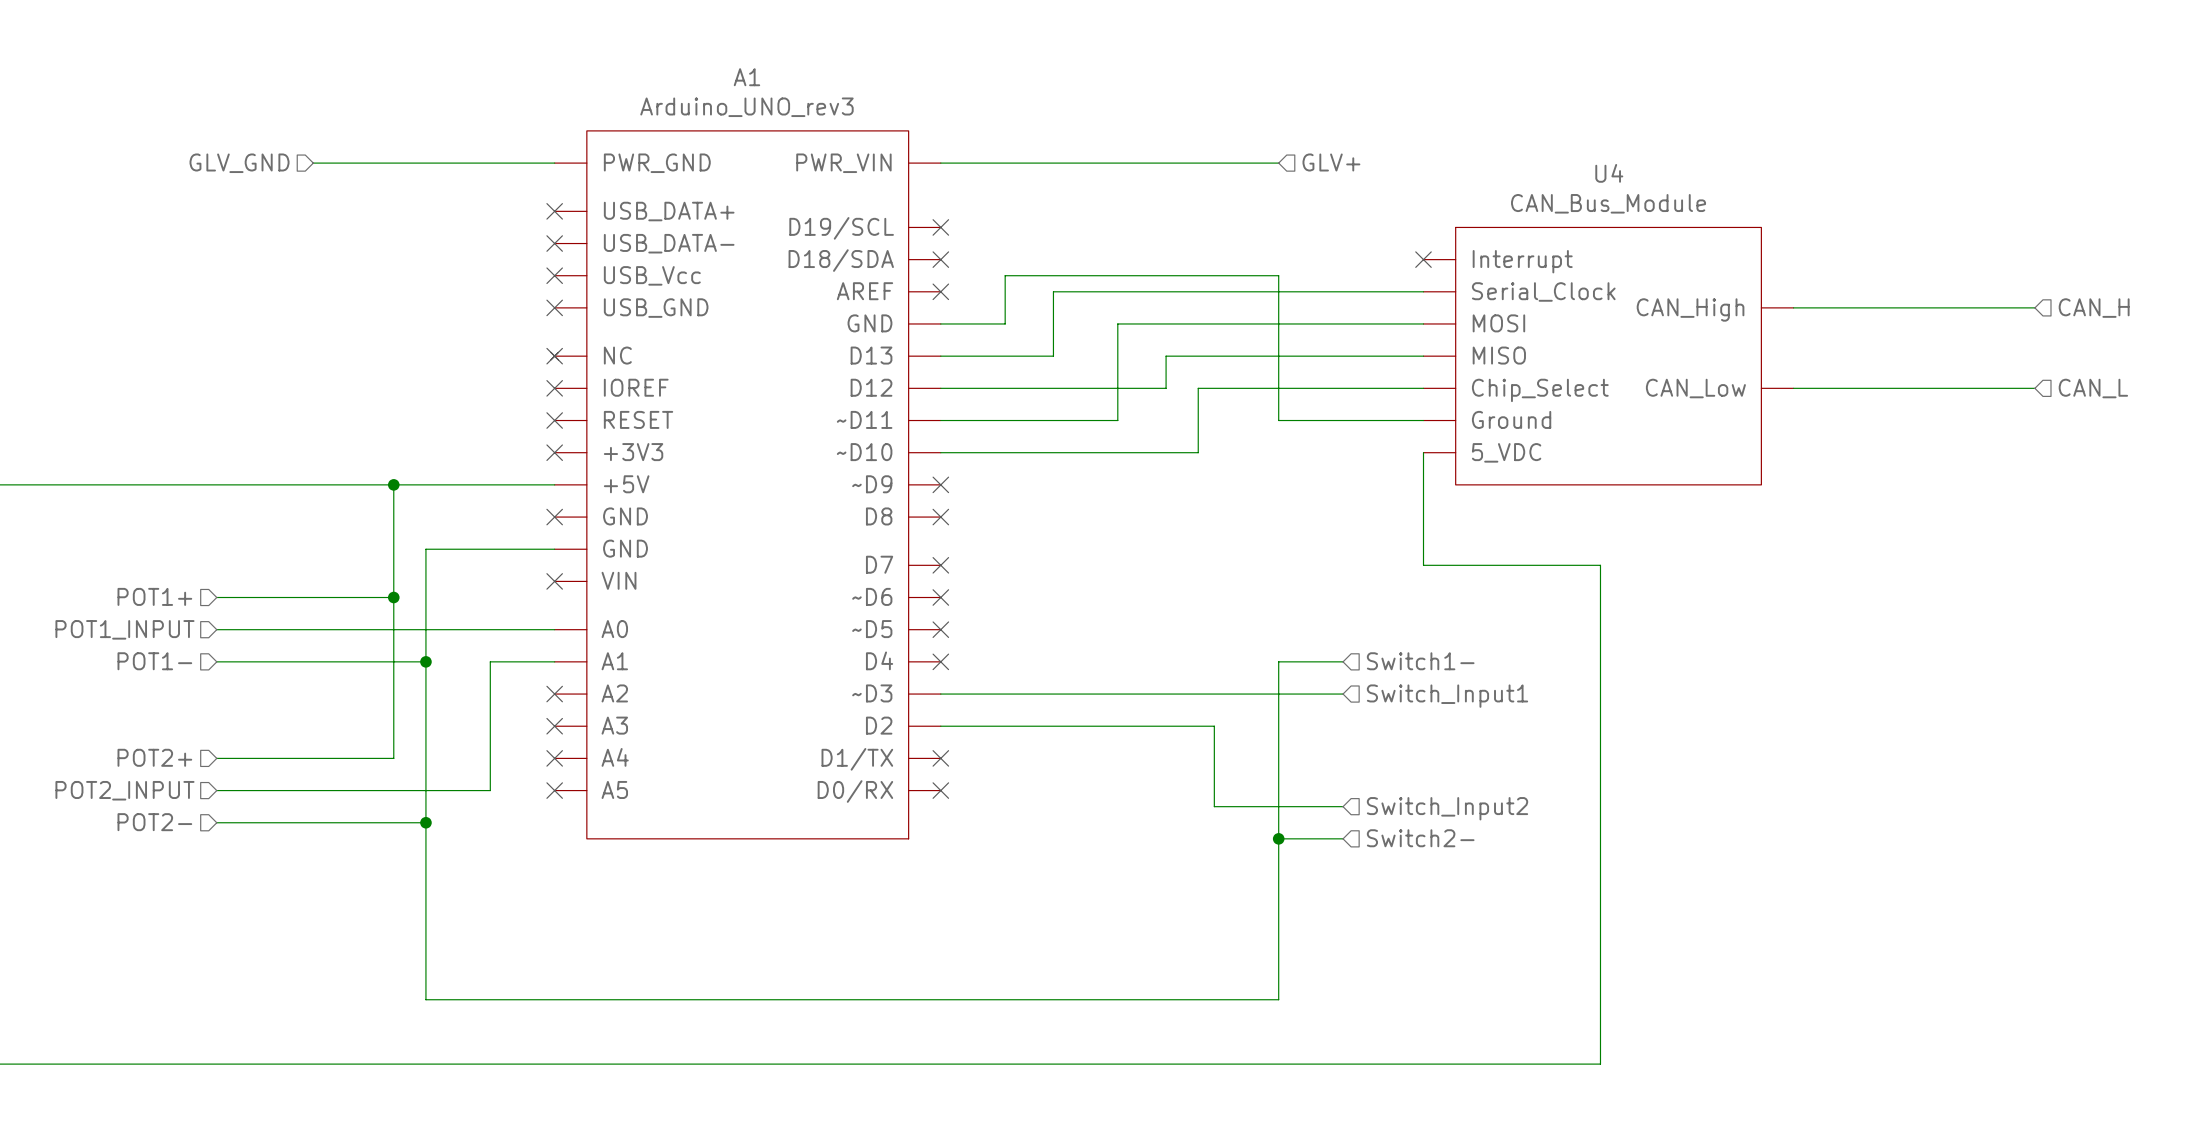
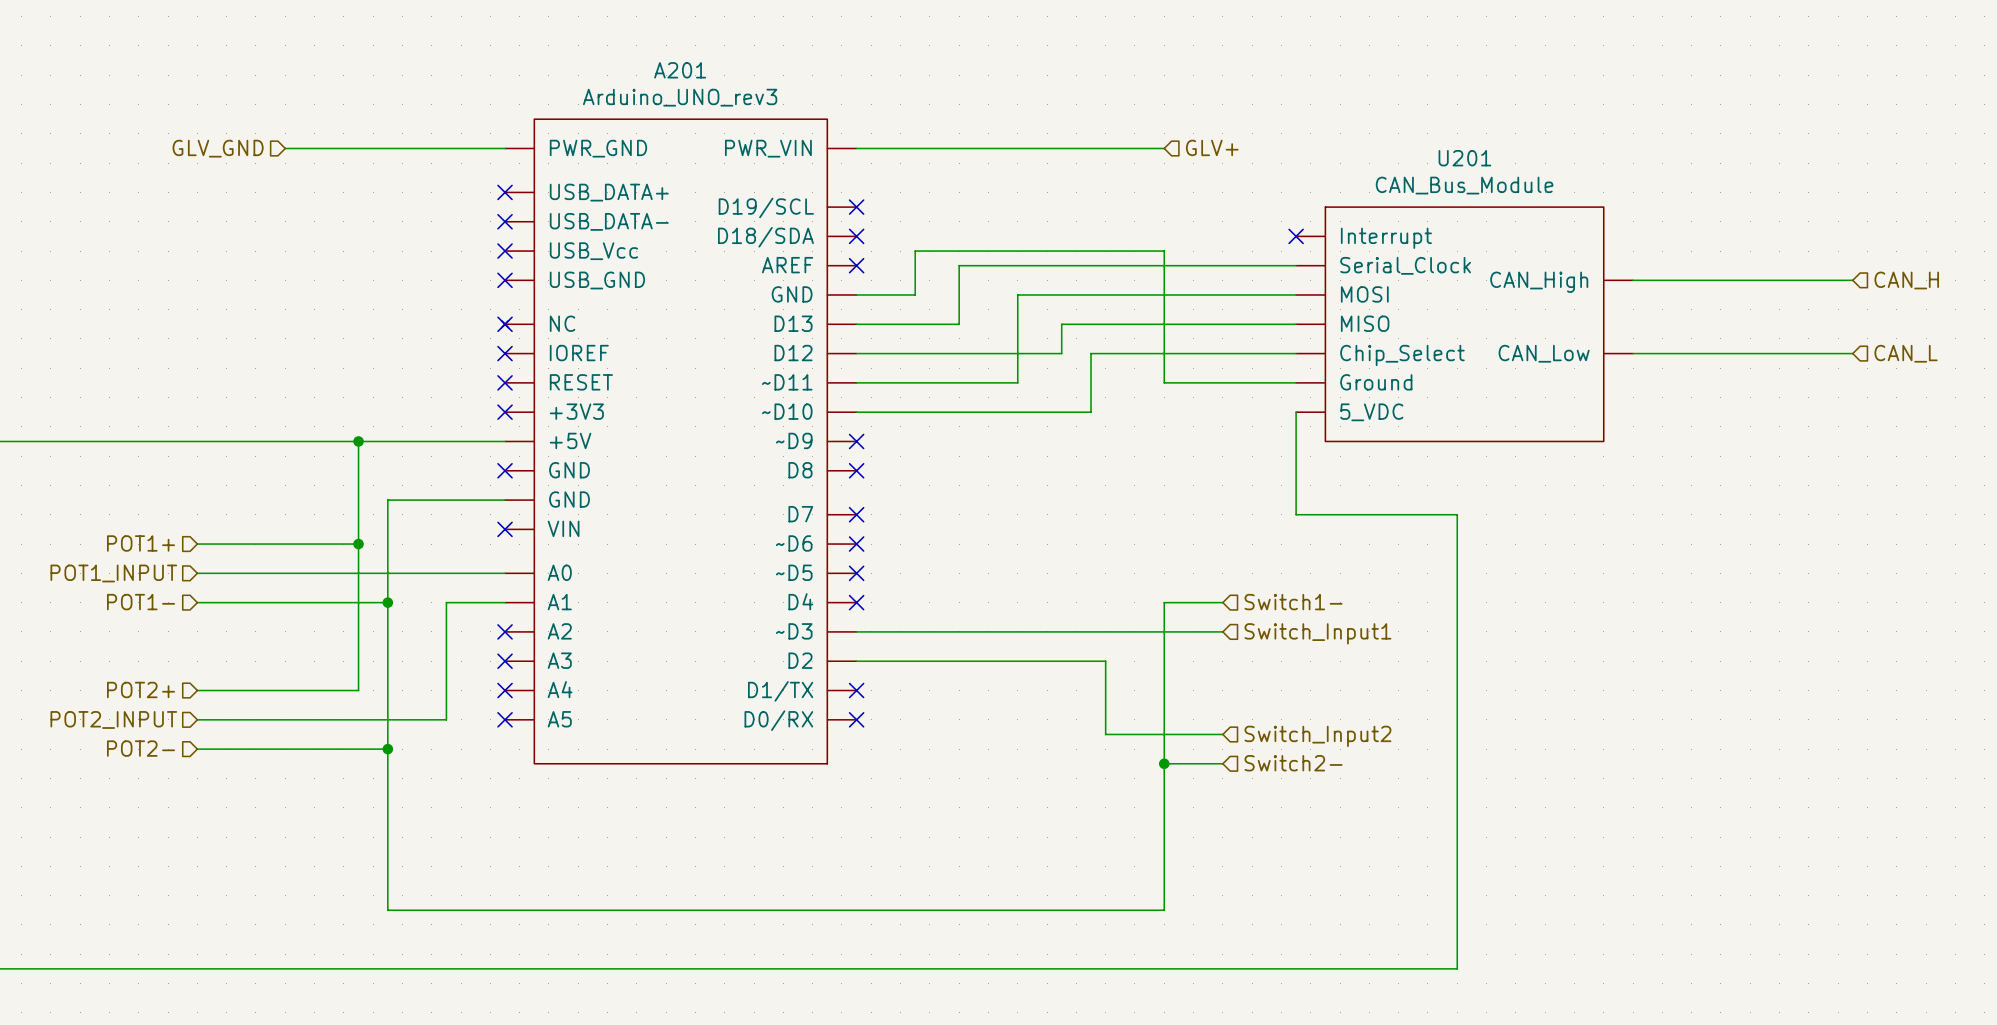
A1 name: A1 (746, 77) -> A201 (680, 70)
U4 name: U4 (1609, 173) -> U201 (1464, 158)

